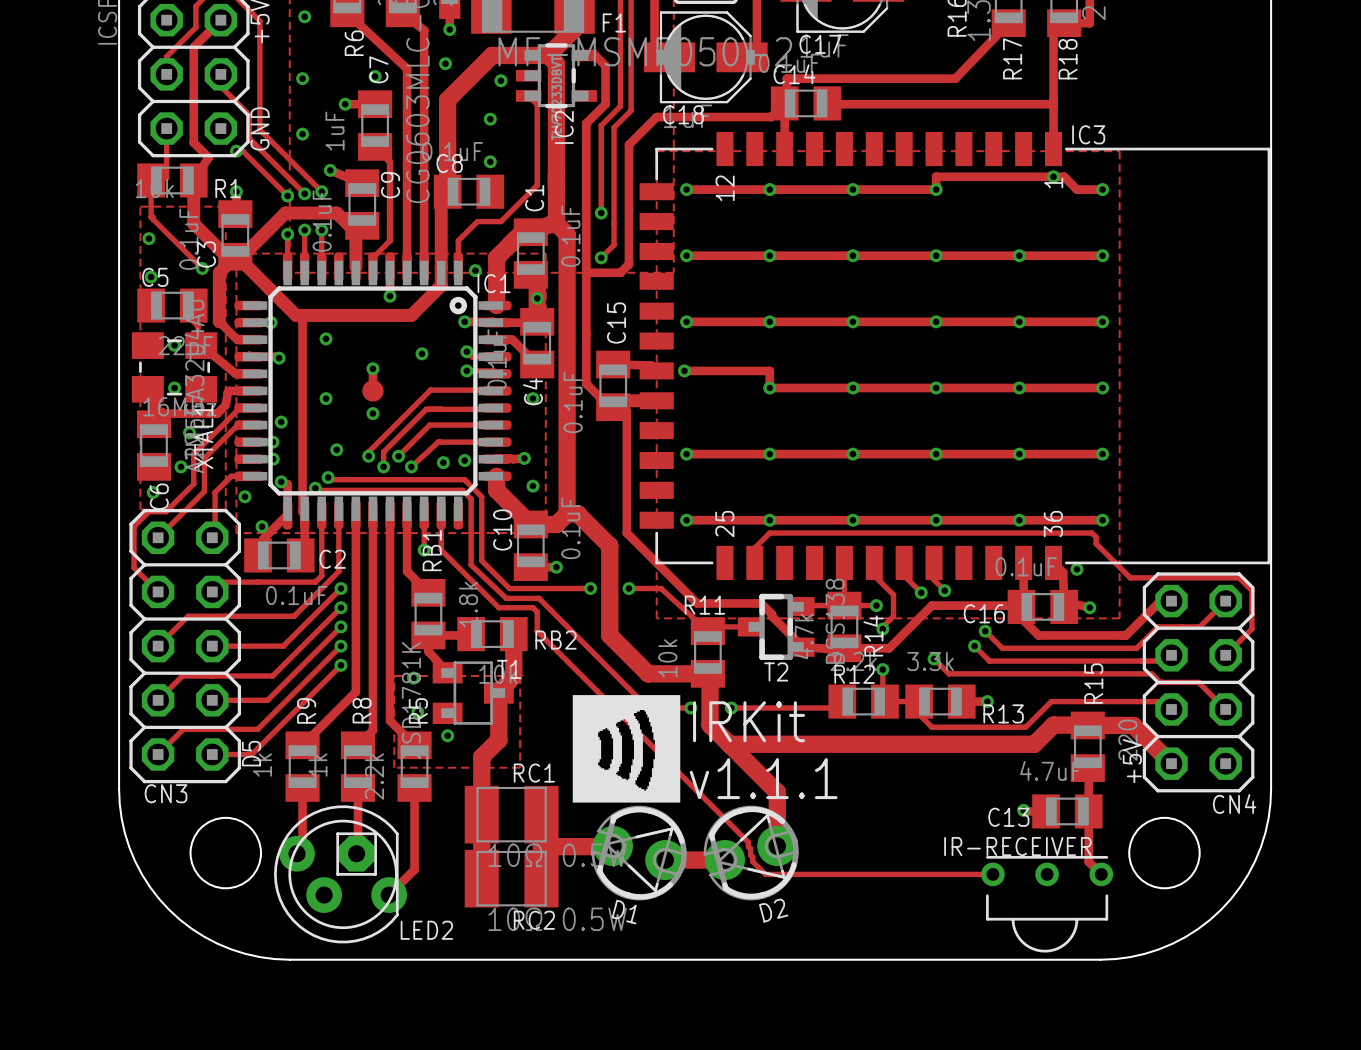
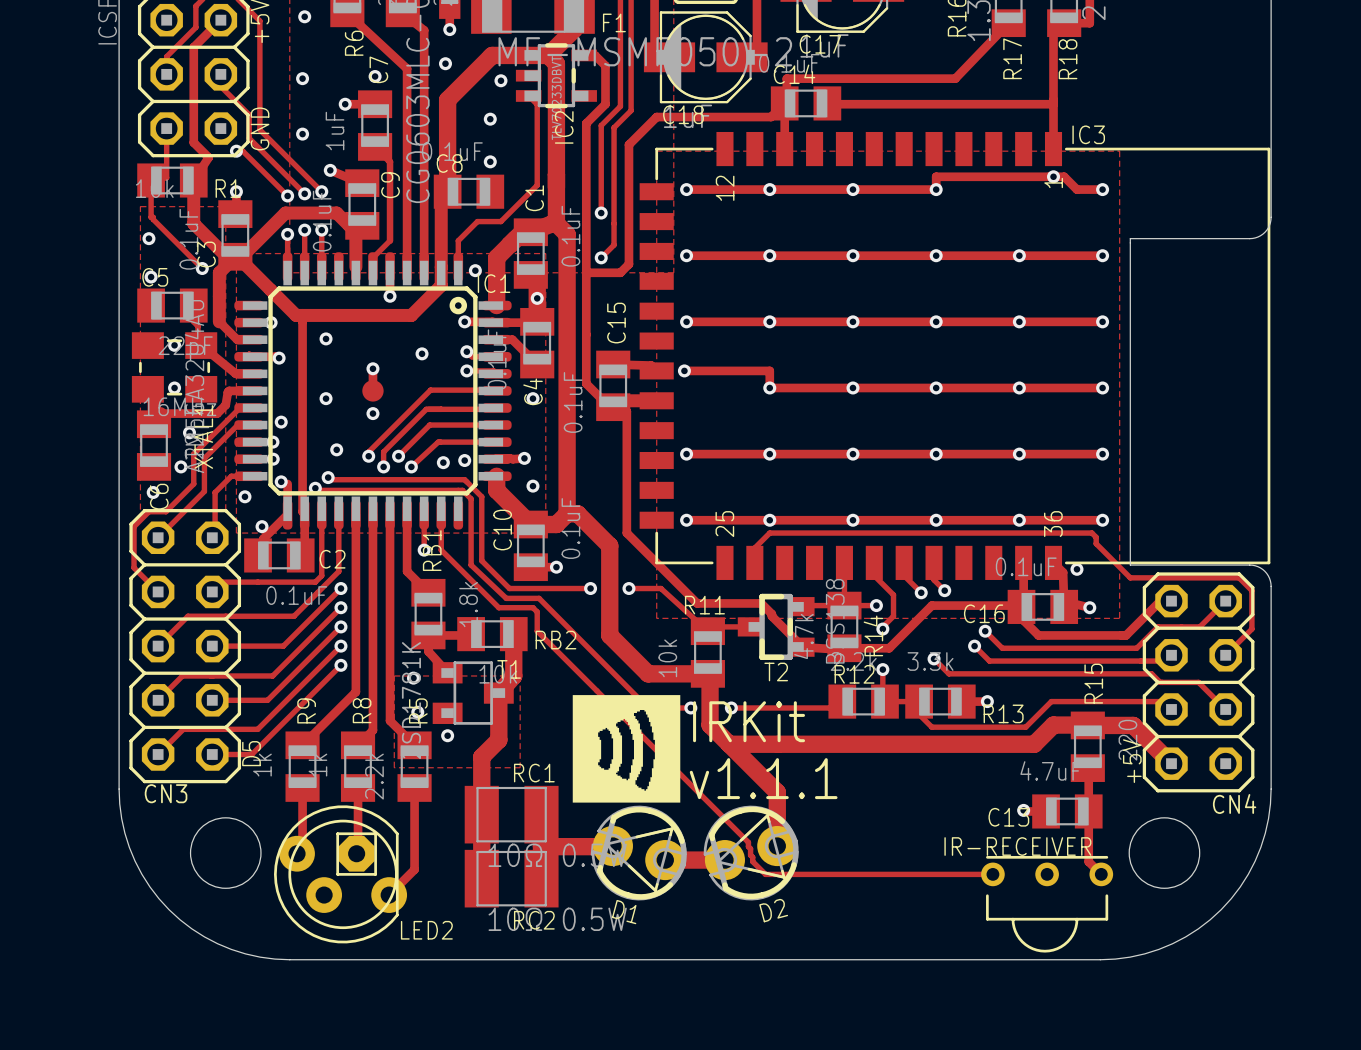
board edge: (1271, 217) (1271, 586) -> (1271, 217) (1266, 230) (1260, 235) (1252, 238) (1130, 238) (1130, 565) (1252, 565) (1260, 567) (1266, 573) (1271, 586)

